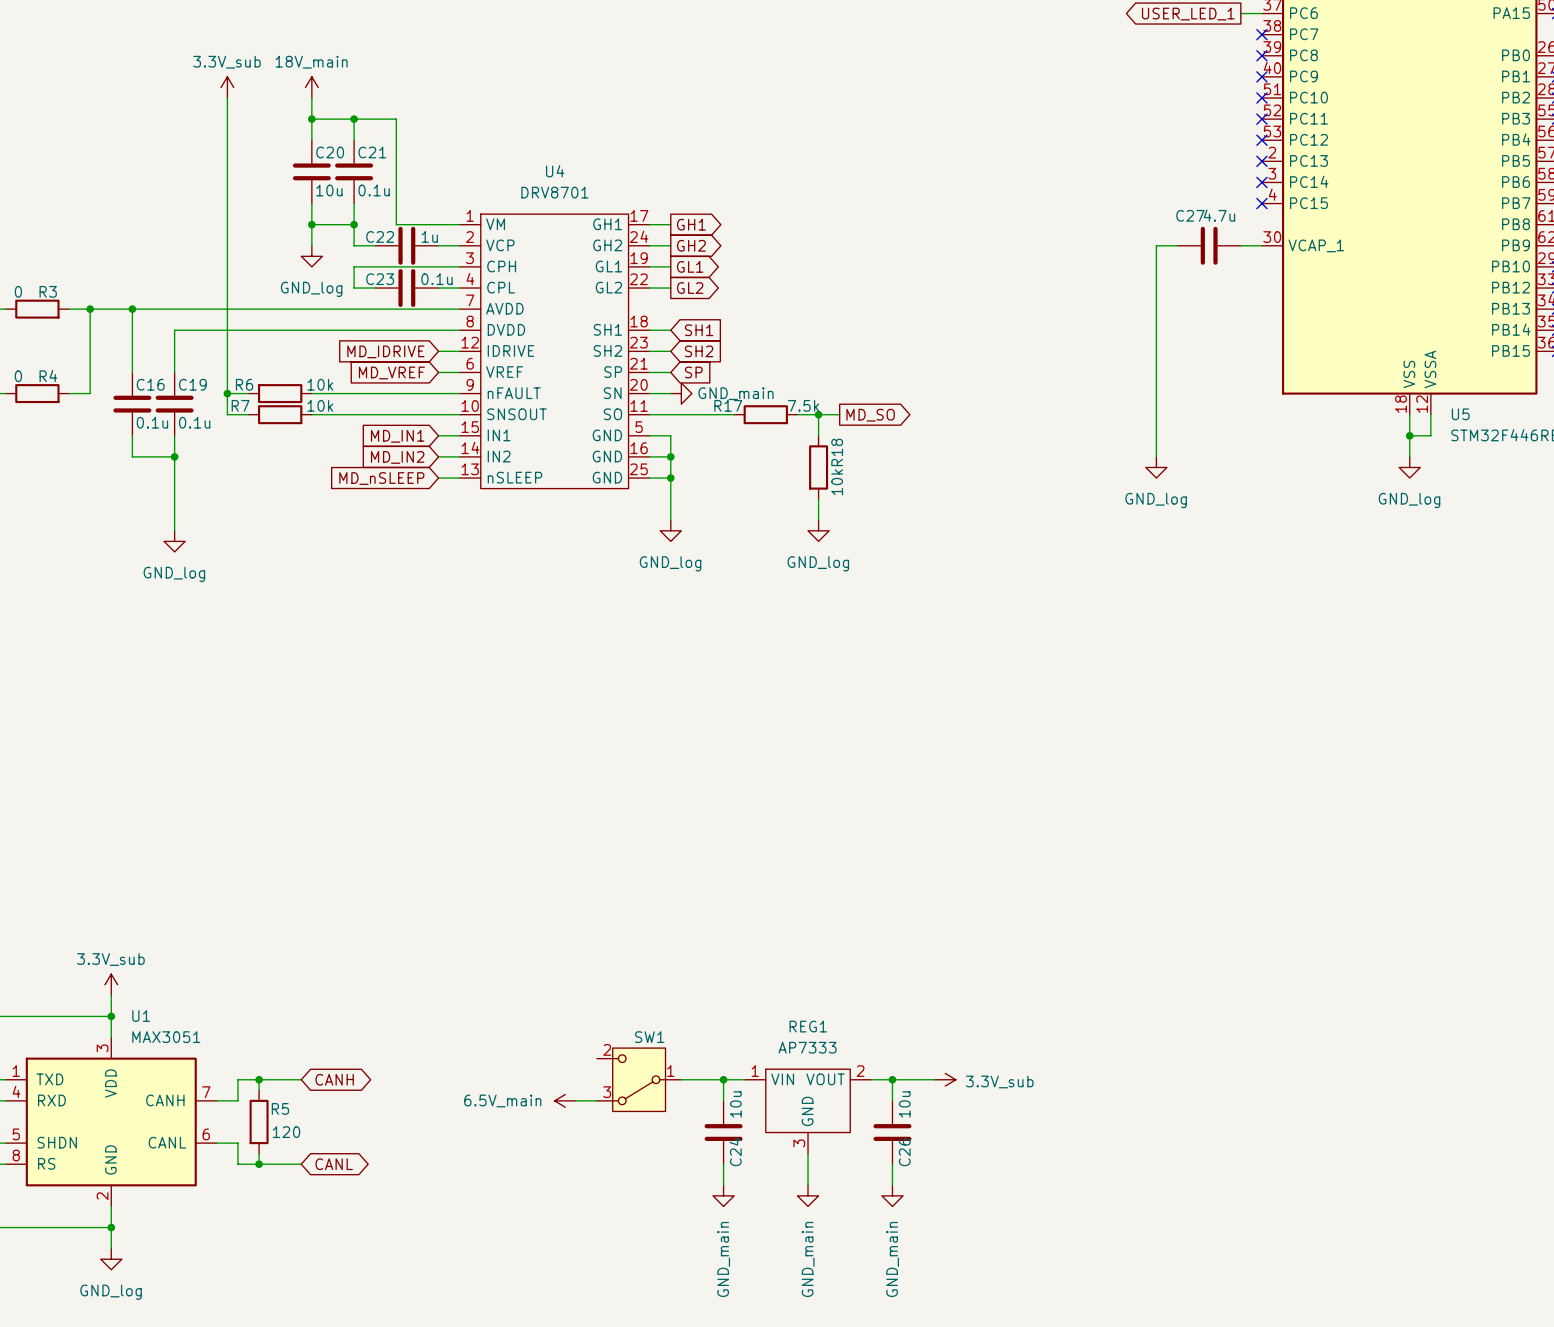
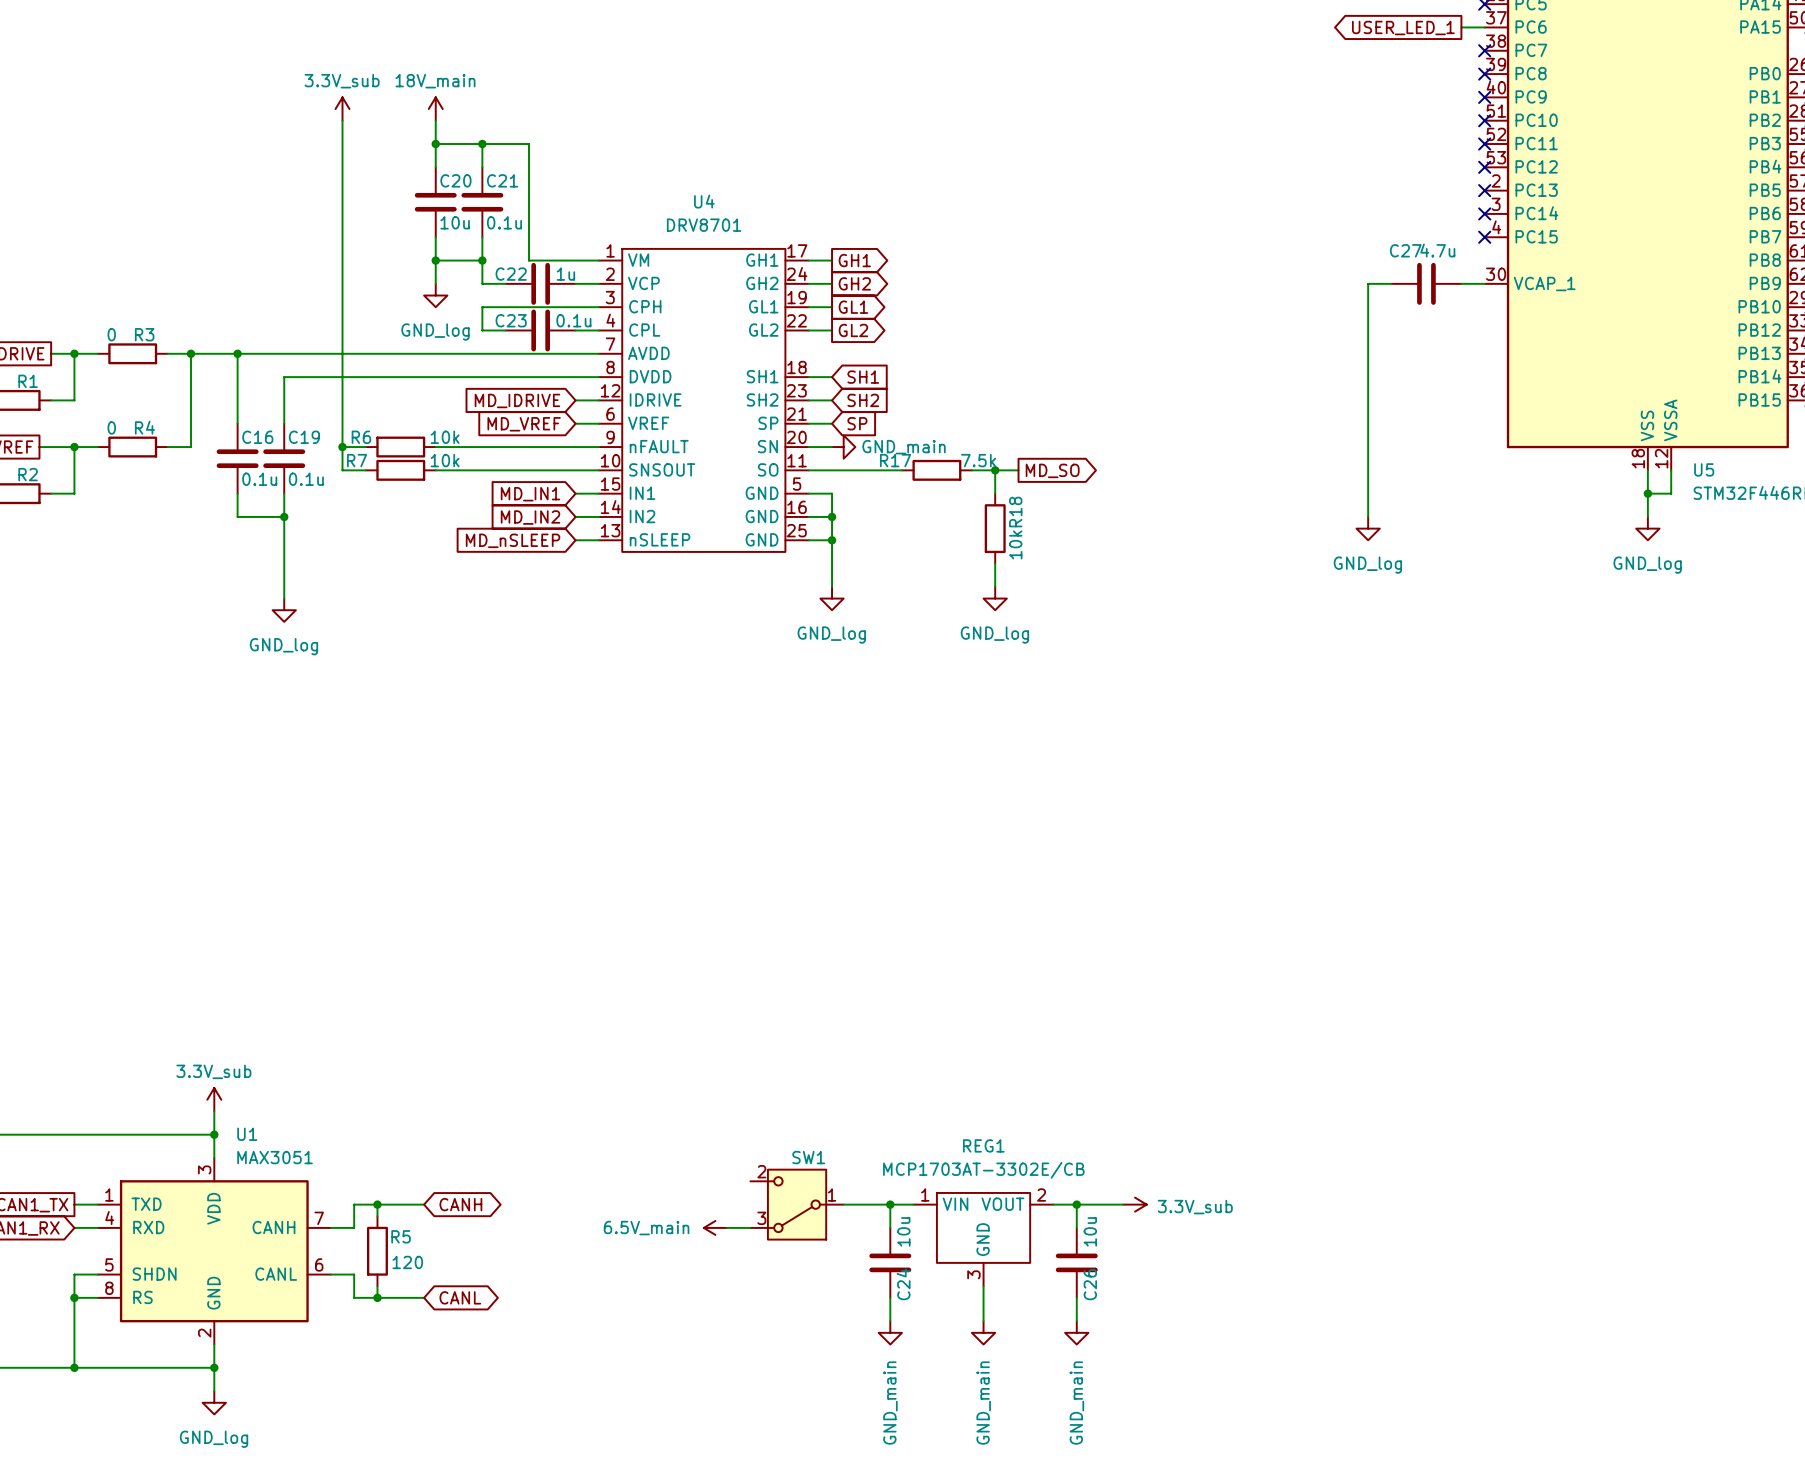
REG1 value: AP7333 (807, 1047) -> MCP1703AT-3302E/CB (983, 1170)

